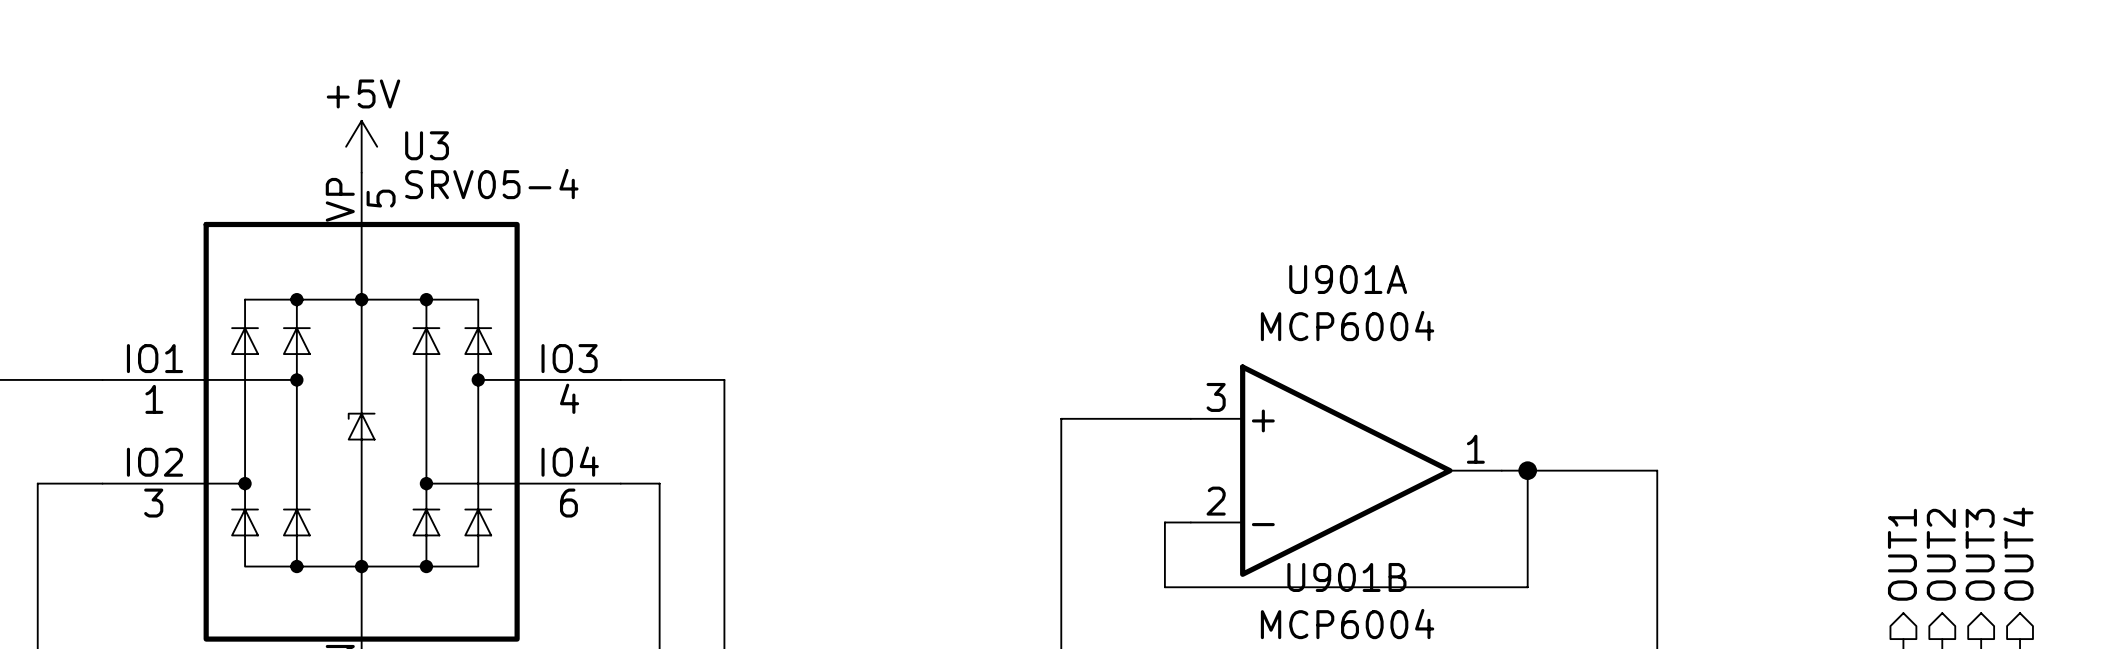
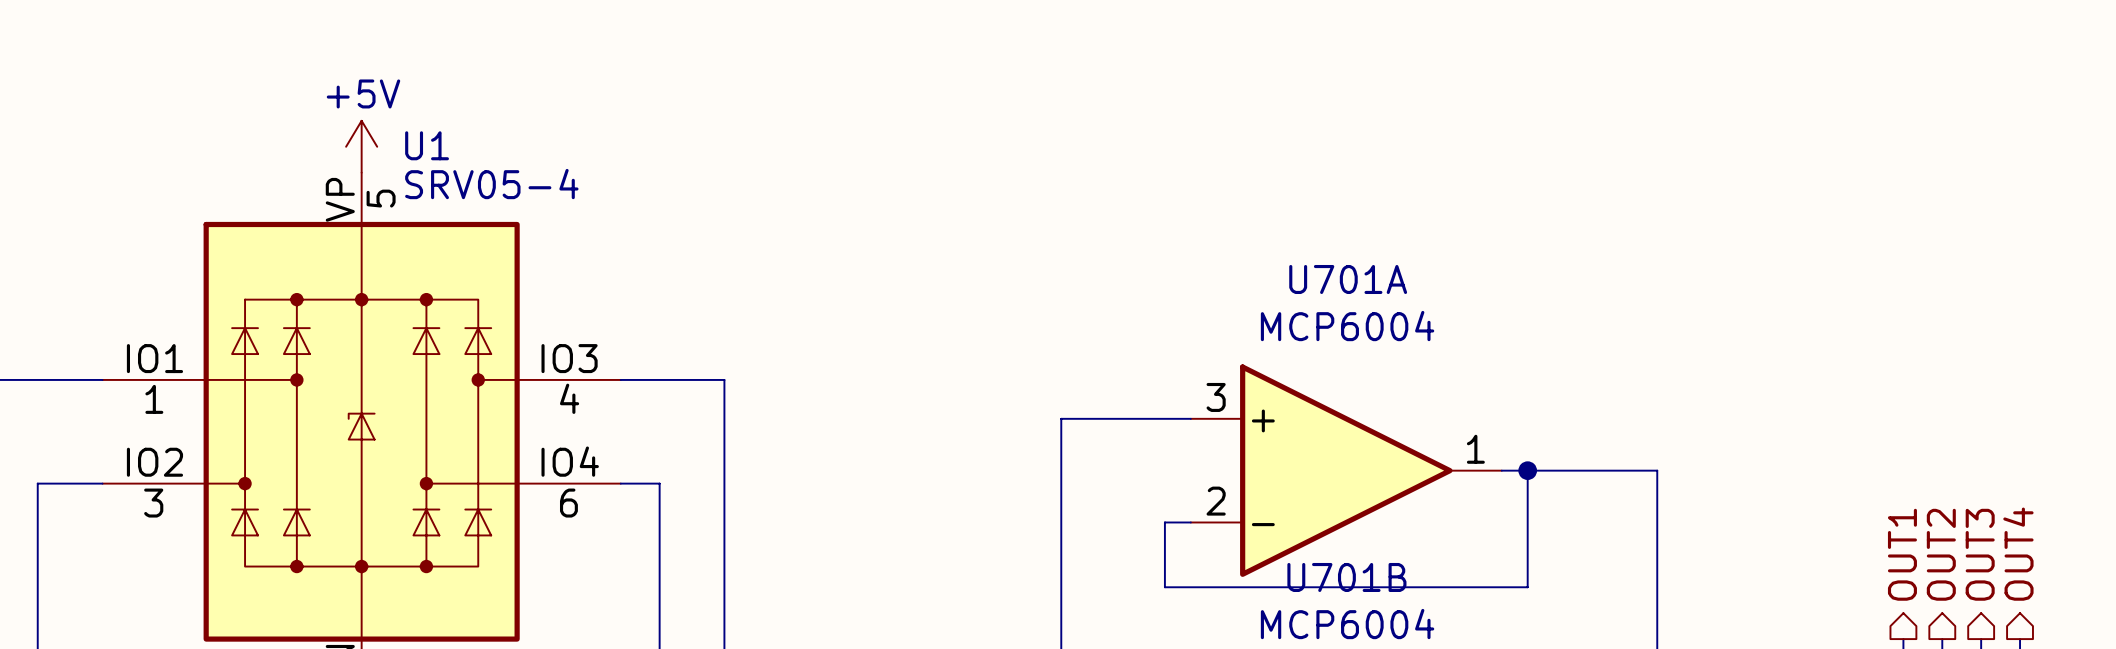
U3 name: U3 (427, 145) -> U1 (427, 145)
U901A name: U901A (1348, 279) -> U701A (1348, 279)
U901B name: U901B (1346, 577) -> U701B (1346, 577)

